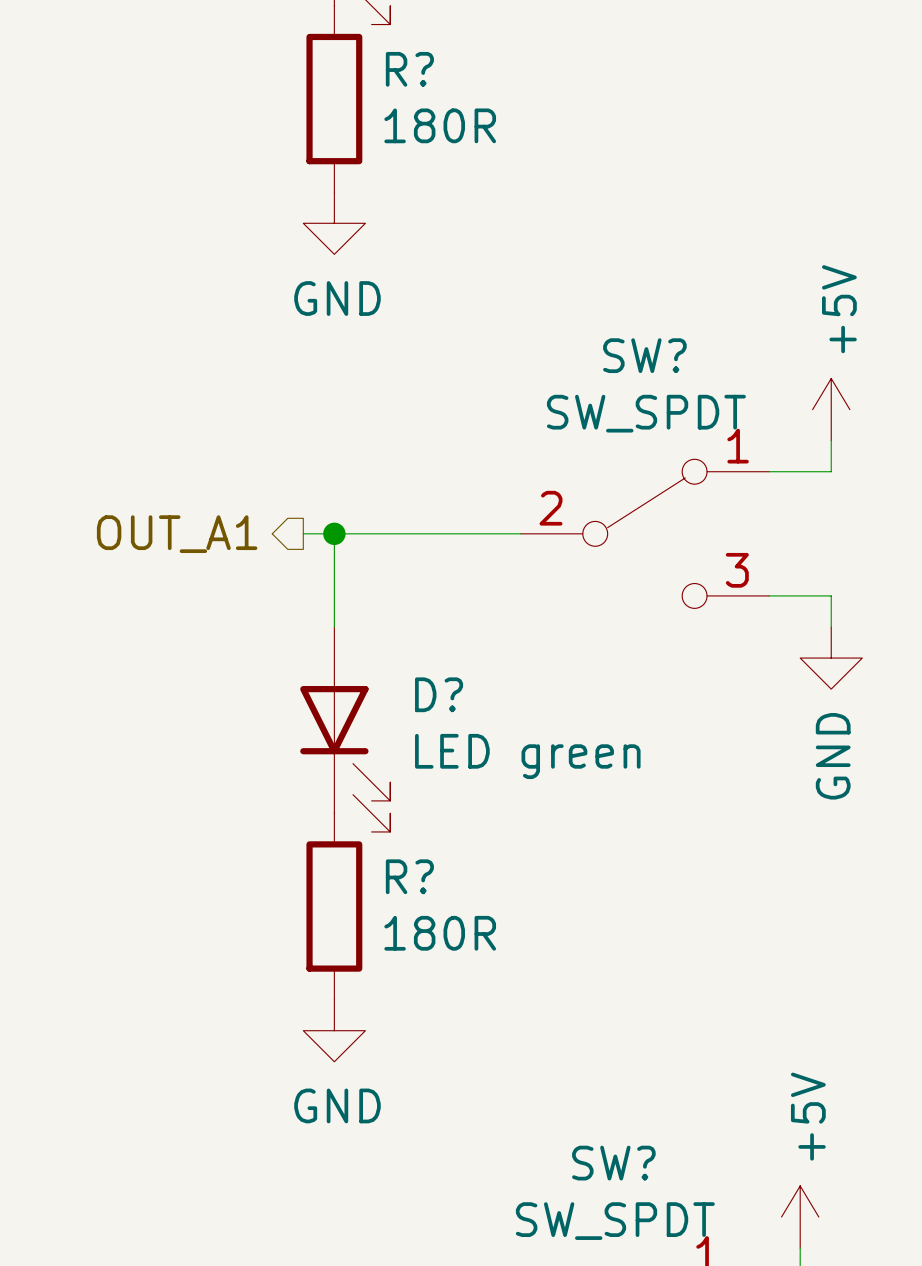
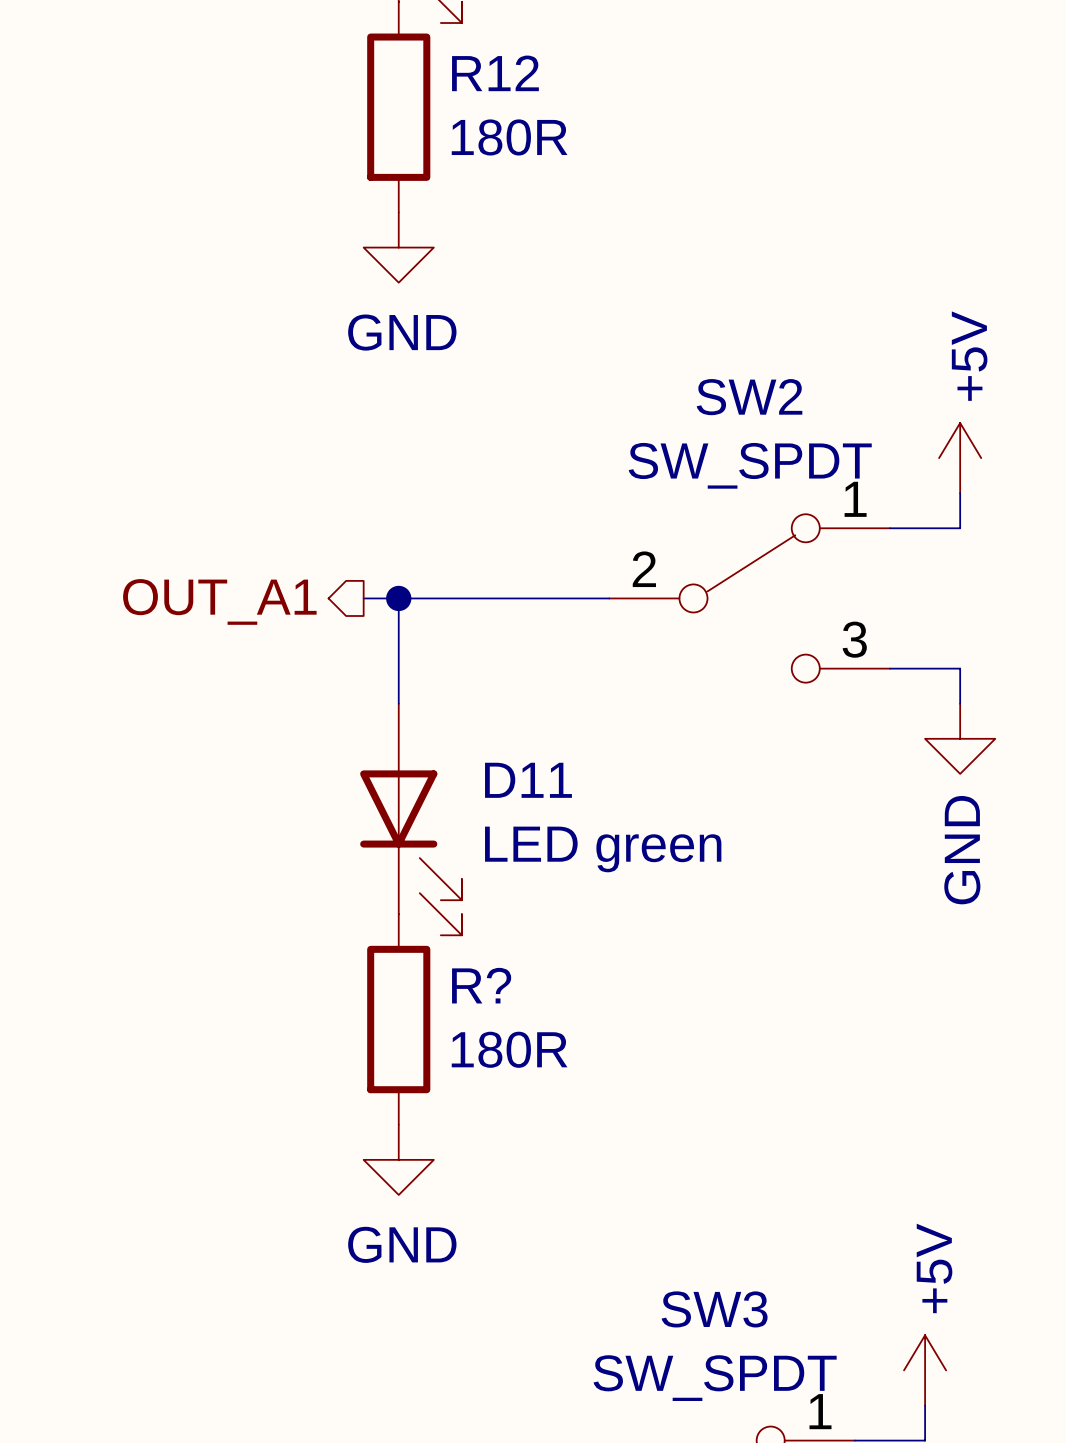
R? name: R? (409, 69) -> R12 (495, 73)
SW? name: SW? (644, 355) -> SW2 (749, 397)
D? name: D? (439, 694) -> D11 (528, 780)
SW? name: SW? (613, 1163) -> SW3 (714, 1309)

